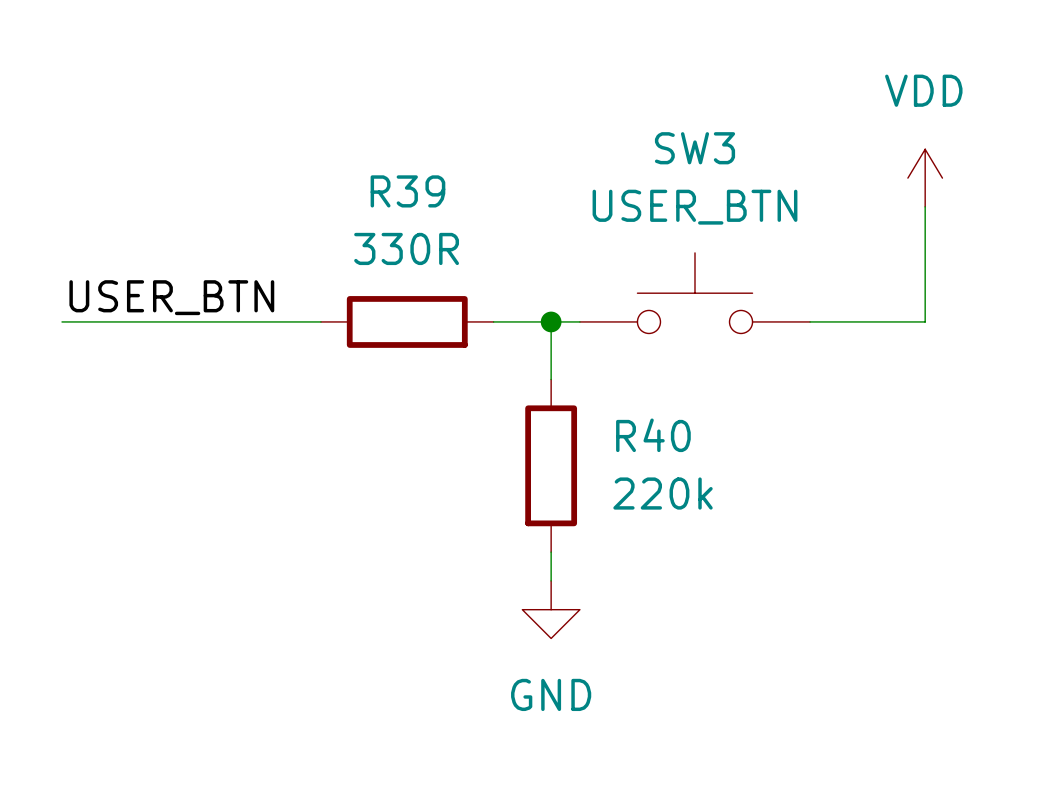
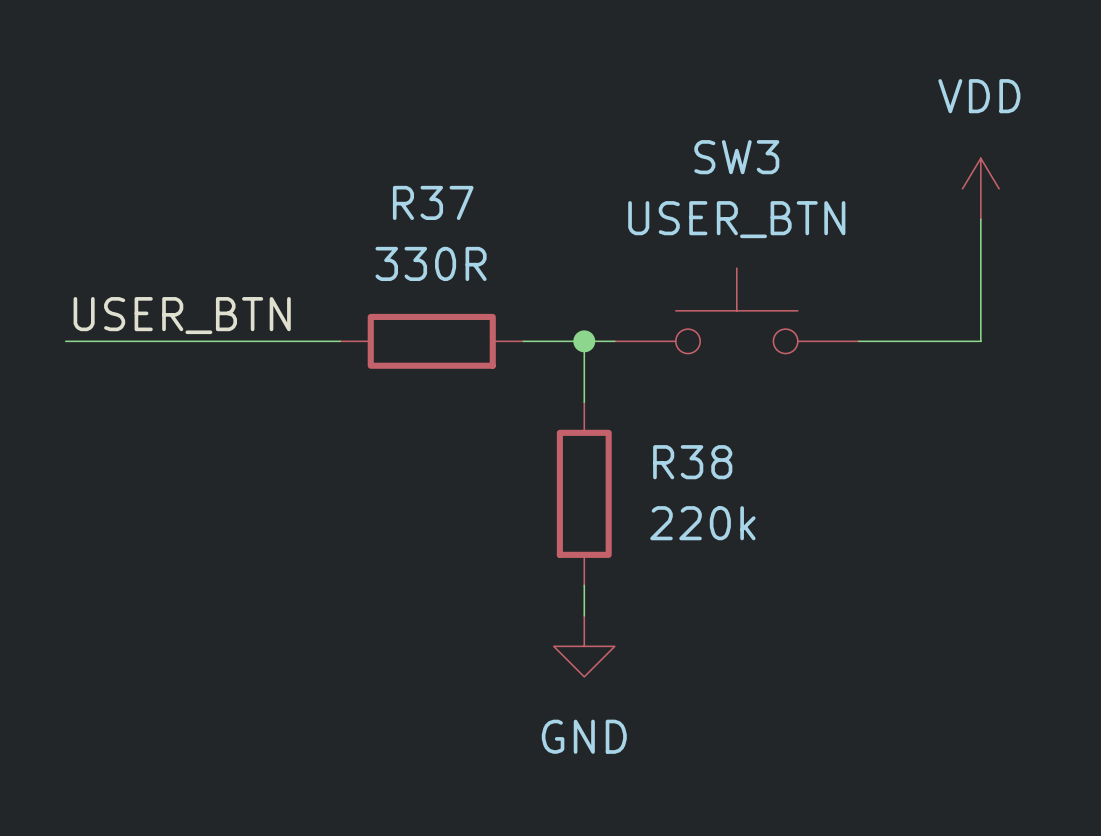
R39 name: R39 (407, 191) -> R37 (433, 202)
R40 name: R40 (653, 435) -> R38 (692, 462)

